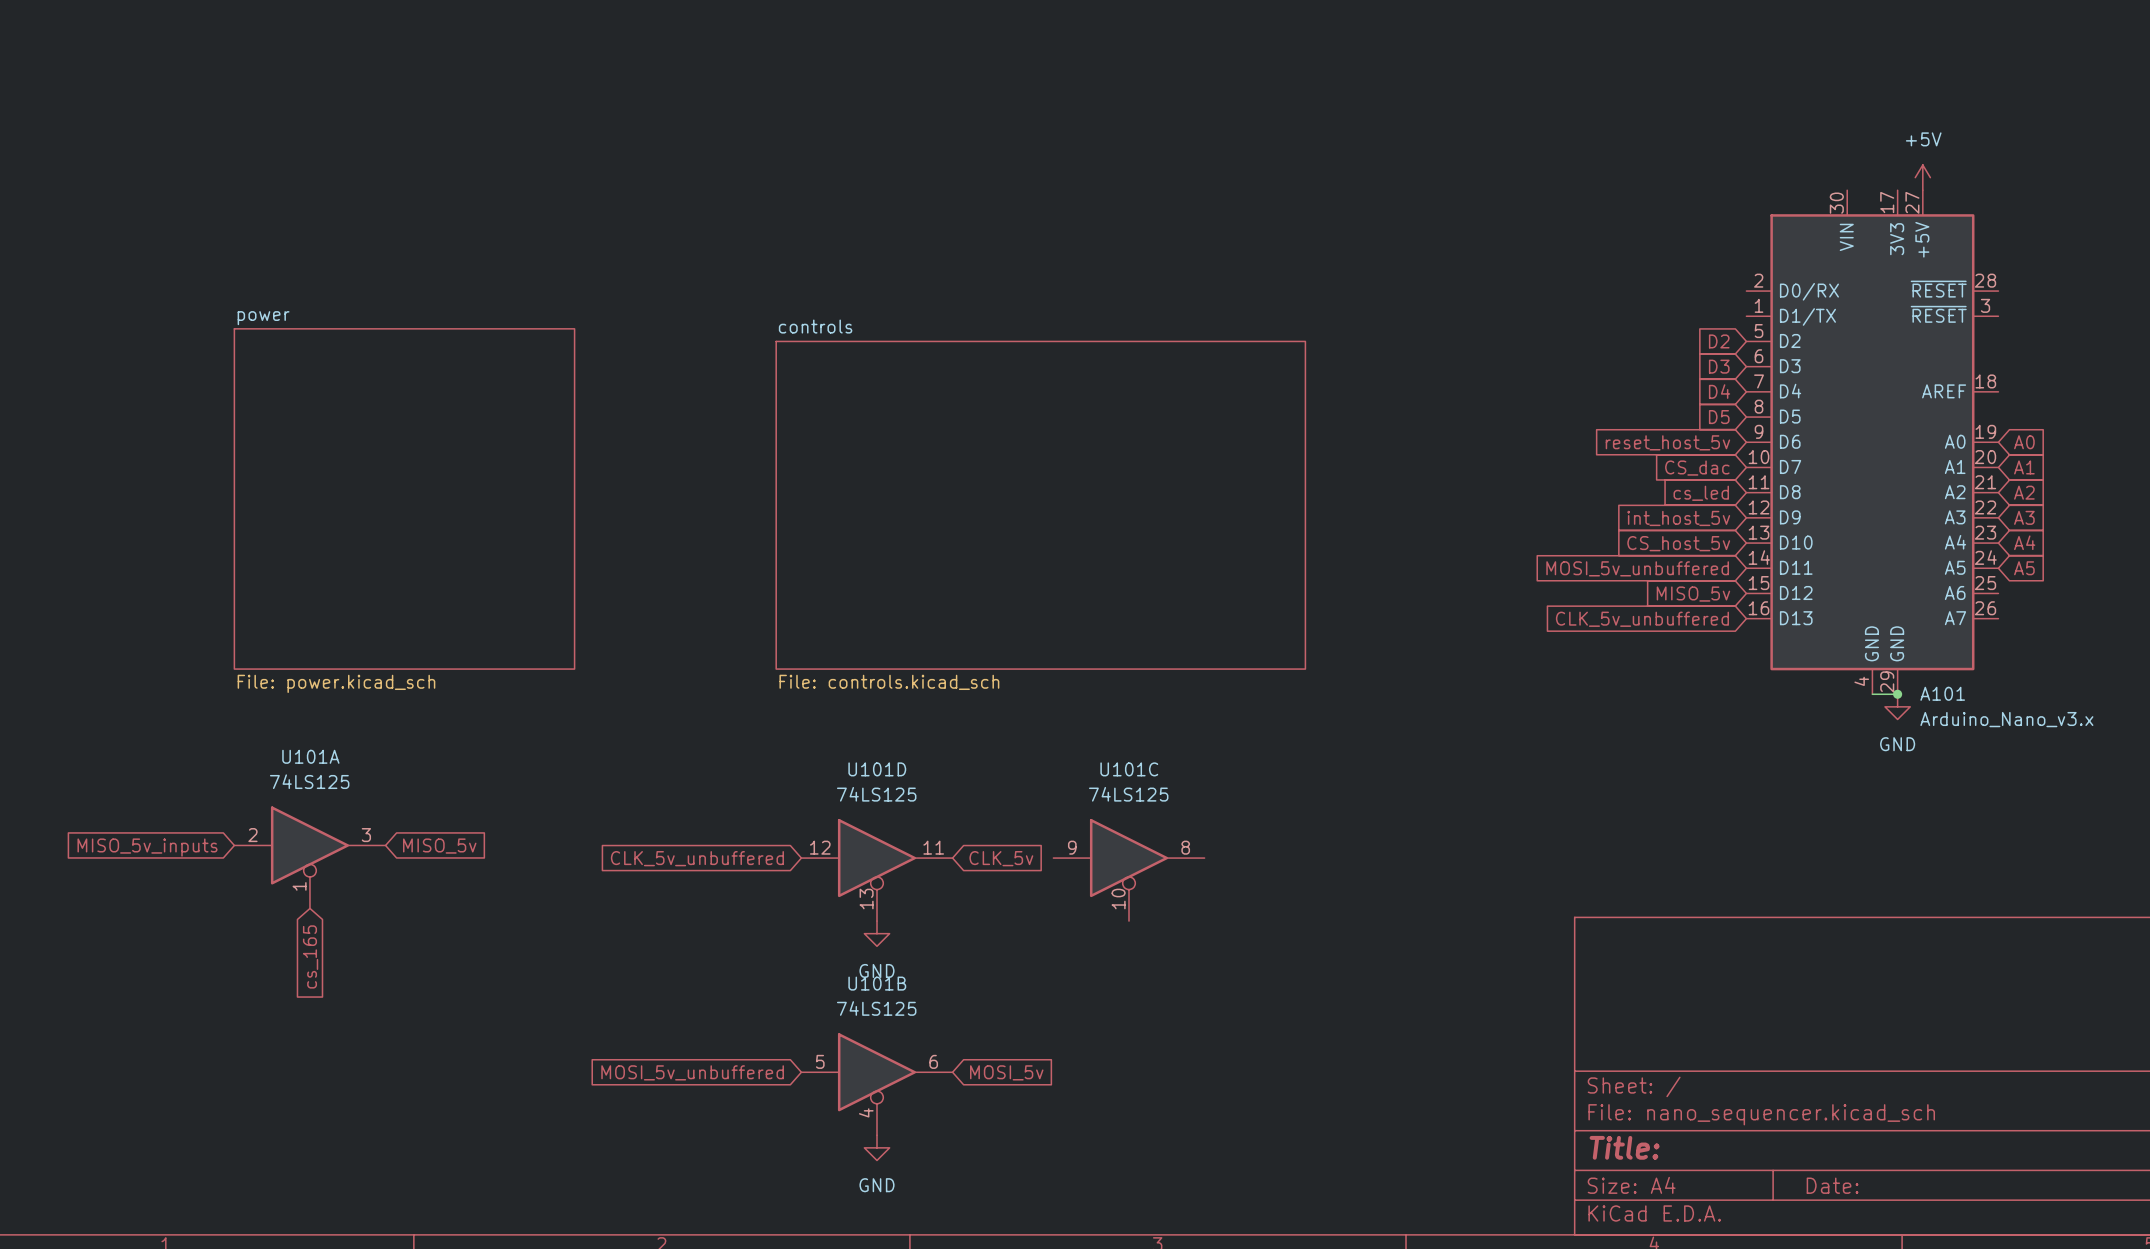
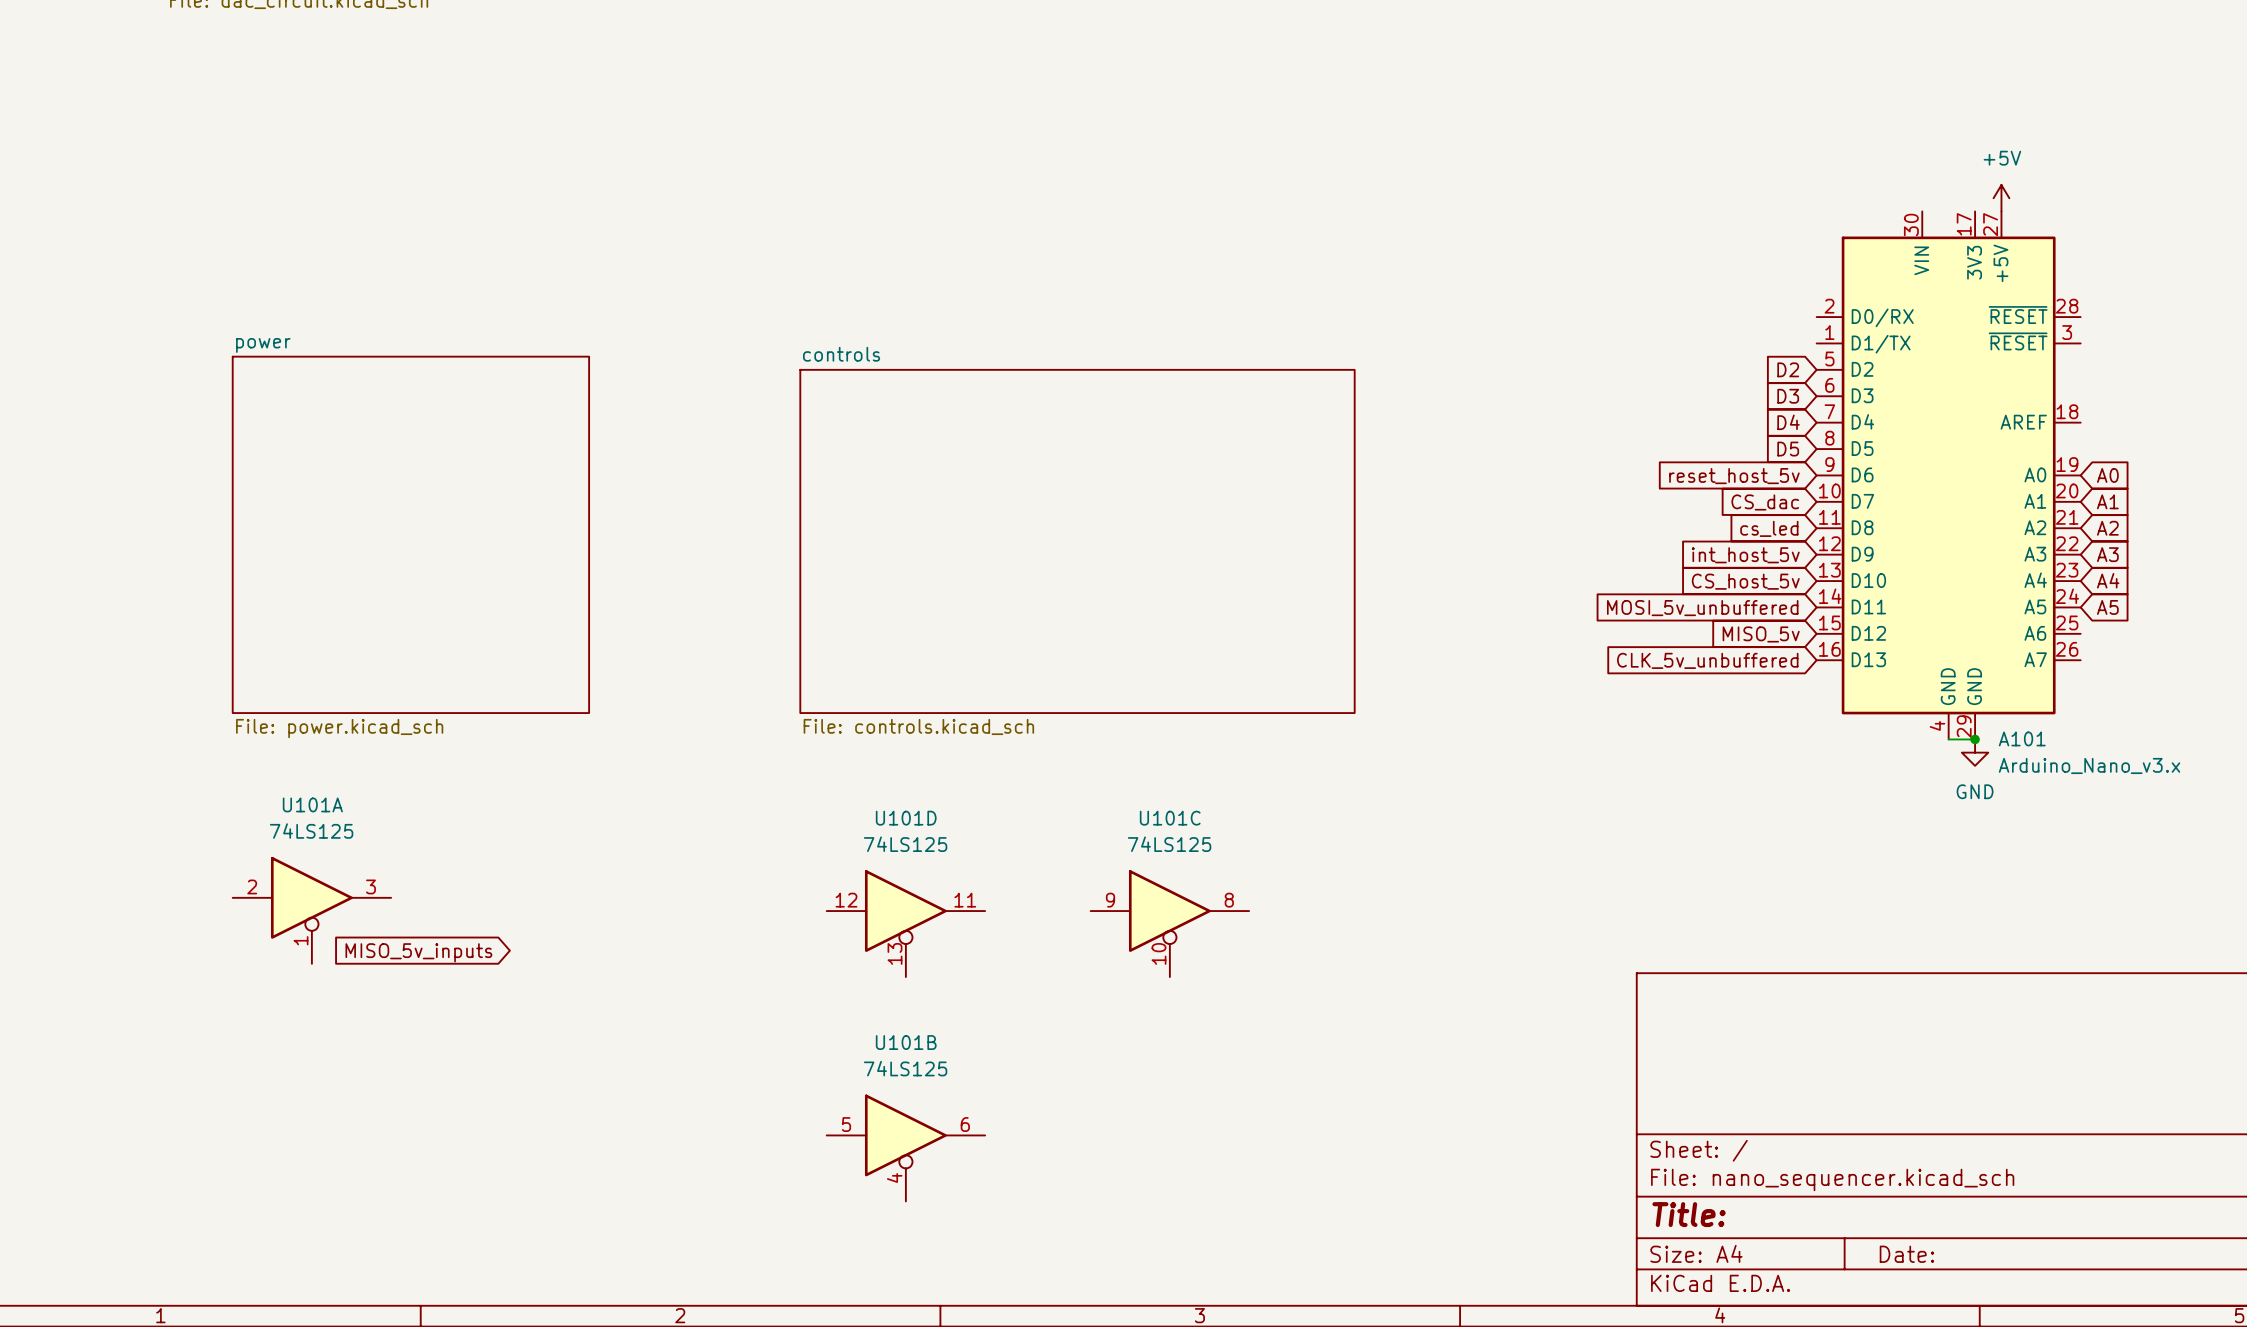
global label: MISO_5v (439, 846) -> none
global label: MISO_5v_inputs (147, 847) -> none
global label: CLK_5v_unbuffered (697, 858) -> none
global label: CLK_5v (1001, 858) -> none
global label: none -> MISO_5v_inputs (418, 952)
power symbol: GND (876, 933) -> none
global label: cs_165 (310, 956) -> none
global label: MOSI_5v_unbuffered (692, 1072) -> none
global label: MOSI_5v (1006, 1072) -> none
power symbol: GND (876, 1147) -> none

